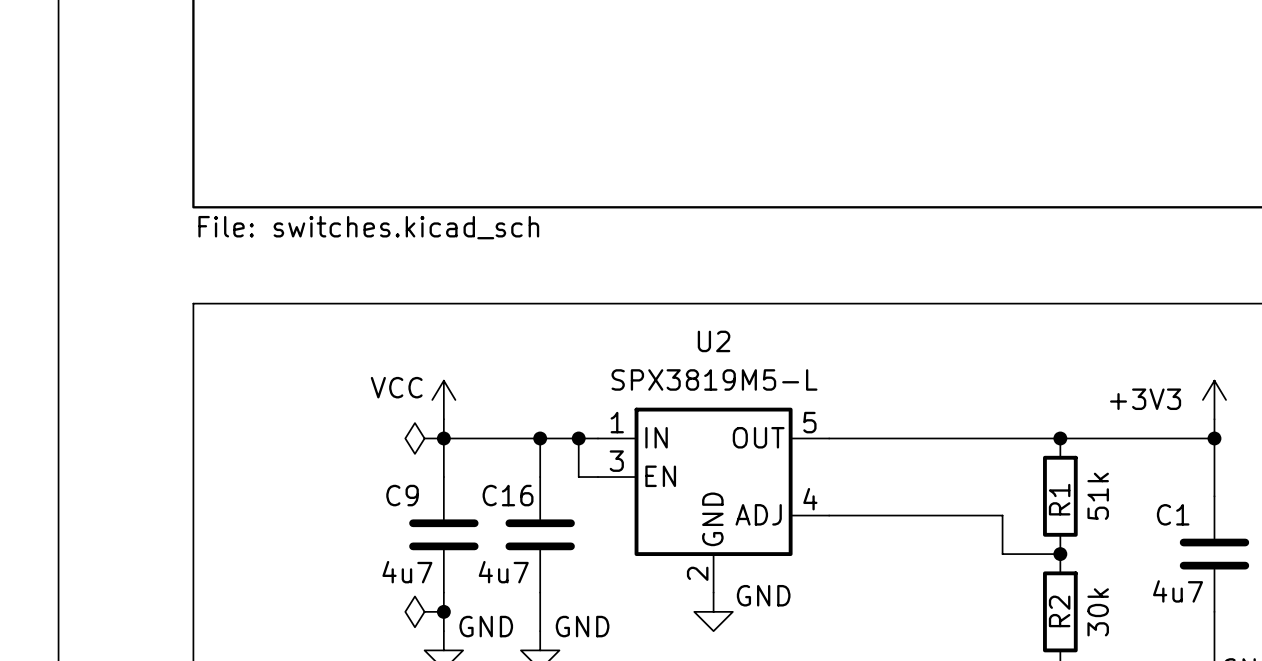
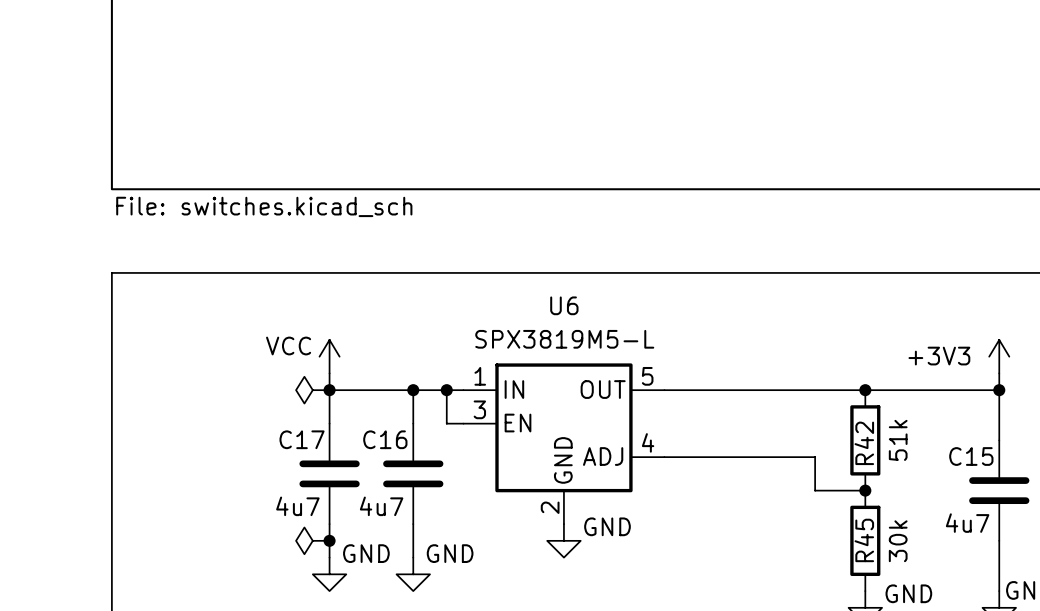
U2 name: U2 (714, 341) -> U6 (564, 305)
C9 name: C9 (402, 495) -> C17 (302, 439)
R1 name: R1 (1059, 499) -> R42 (864, 443)
C1 name: C1 (1173, 514) -> C15 (971, 456)
R2 name: R2 (1059, 611) -> R45 (864, 540)

